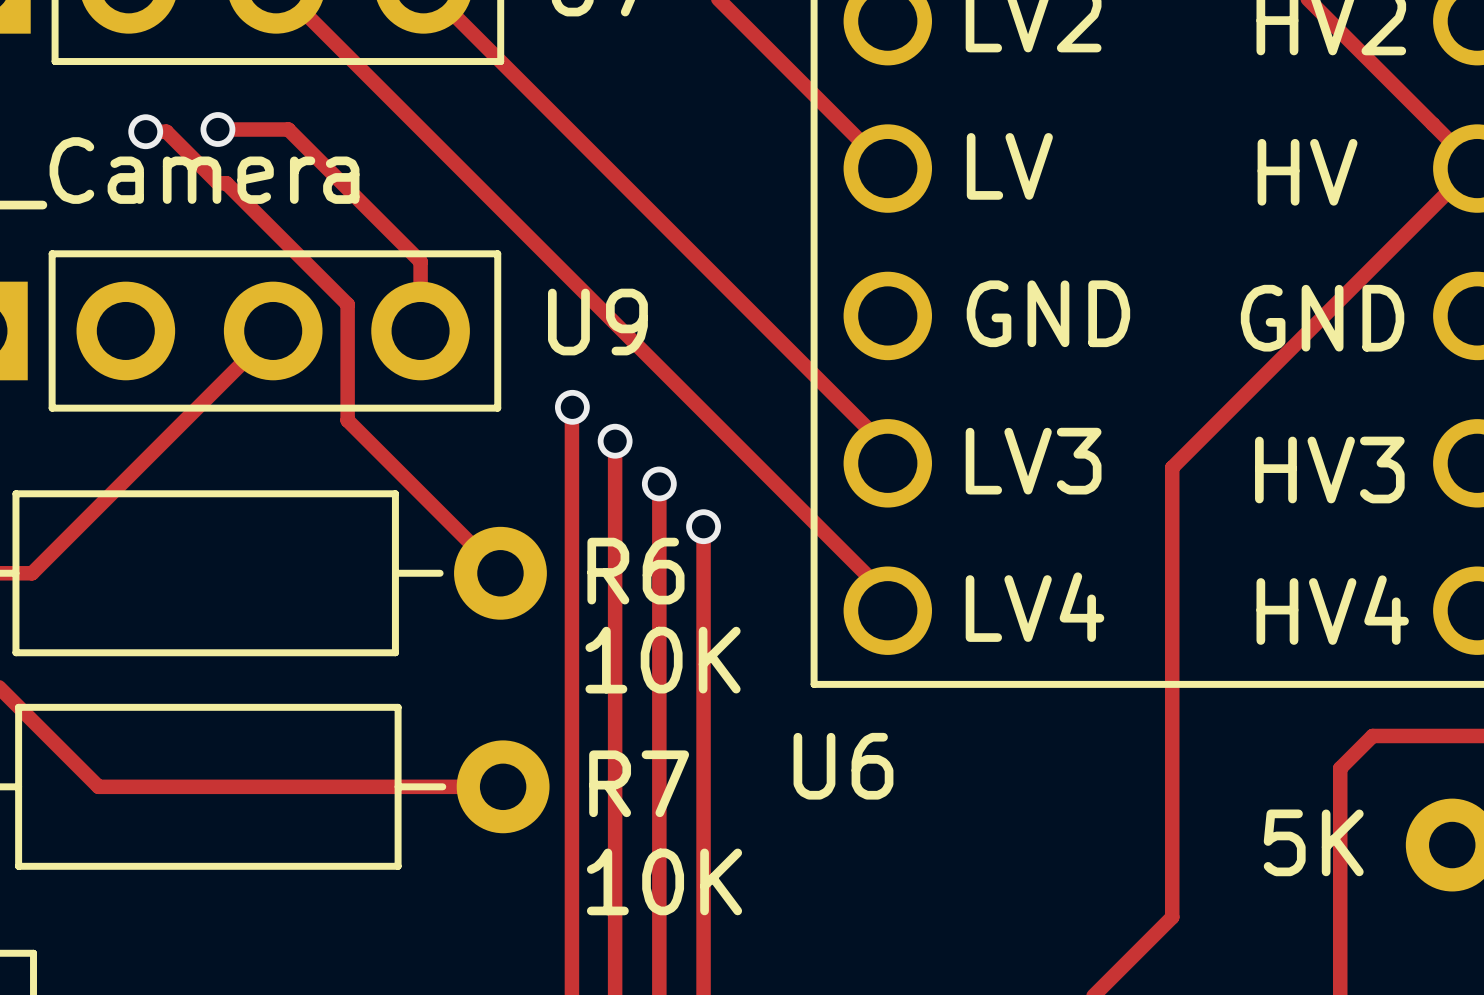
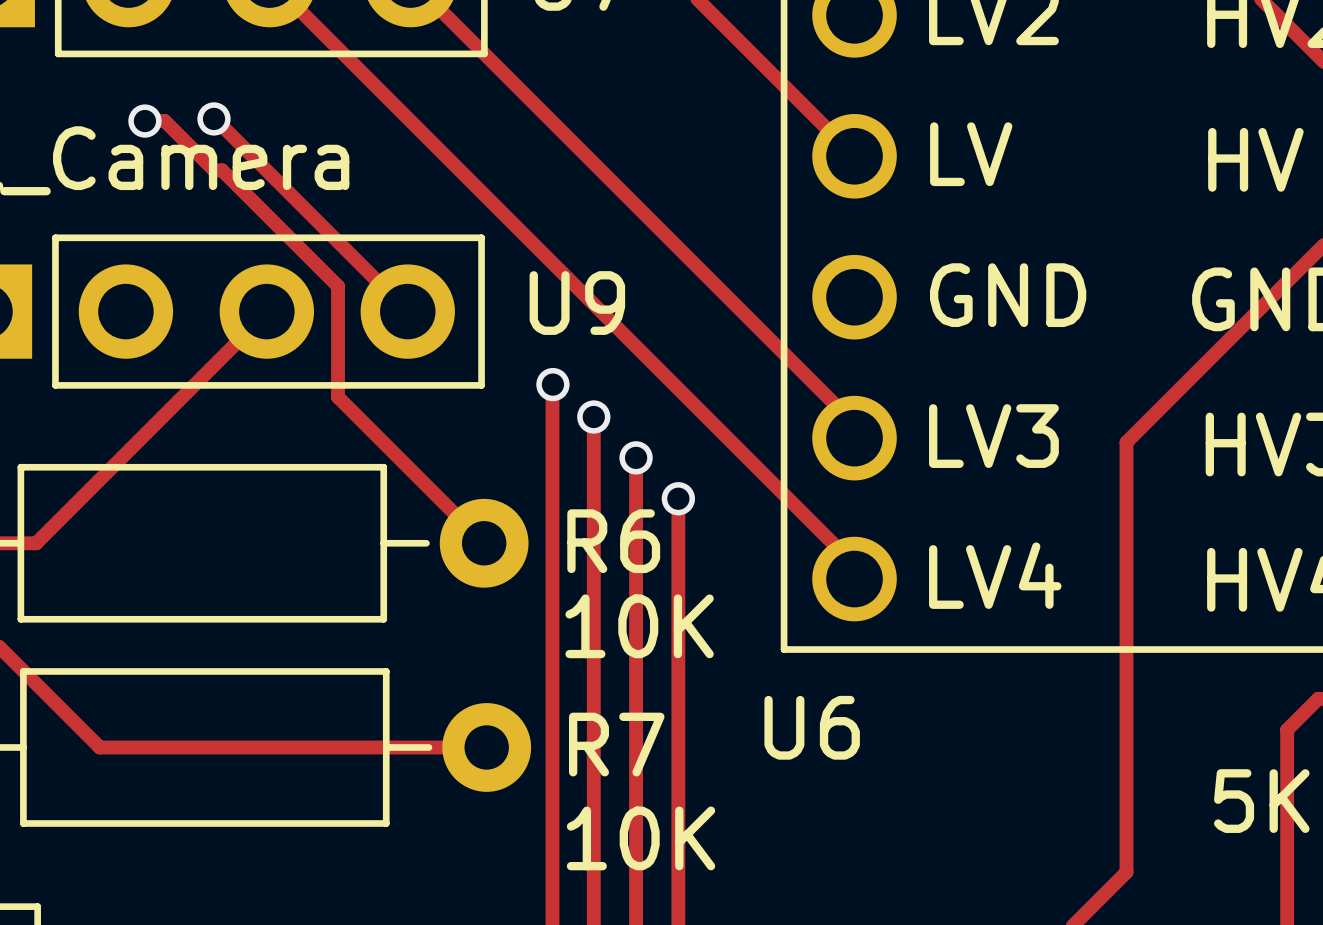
track: (219, 129) (288, 129) (420, 261) (420, 330) -> (215, 118) (407, 311)

